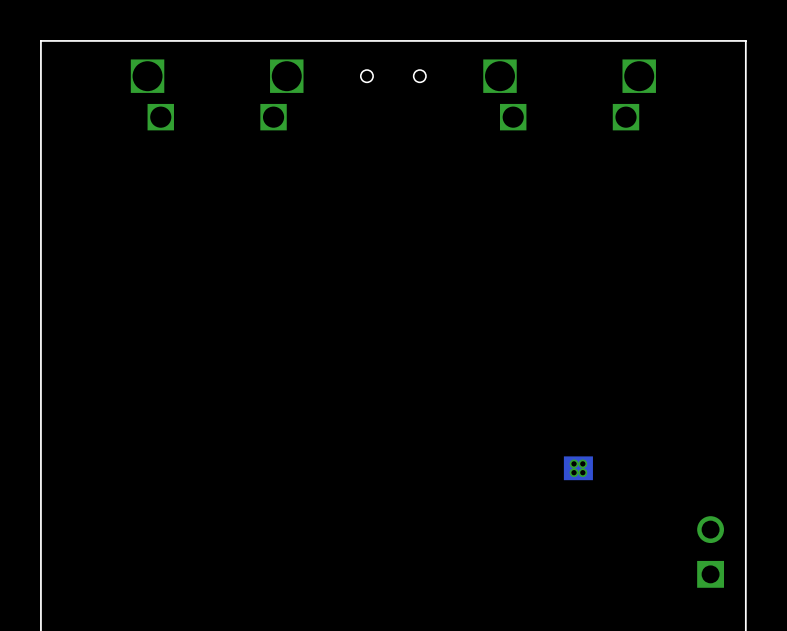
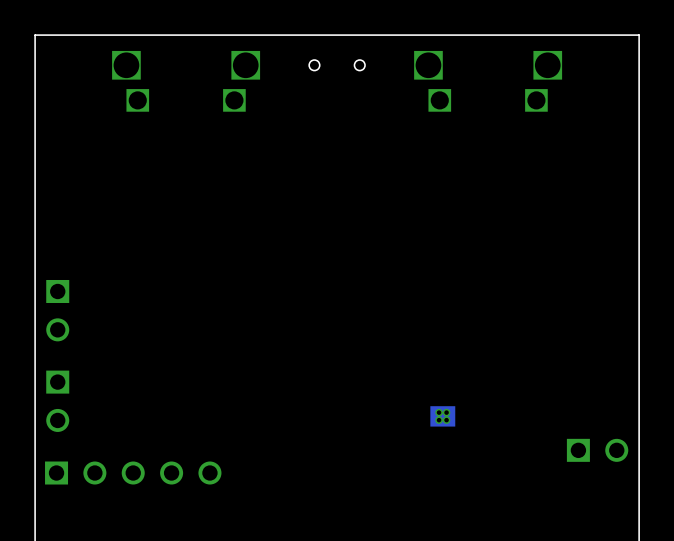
part: none -> (57, 310)
part: none -> (57, 401)
part position: (578, 468) -> (442, 416)
part: none -> (133, 473)
part rotation: 0° (710, 551) -> 90° clockwise (597, 450)

